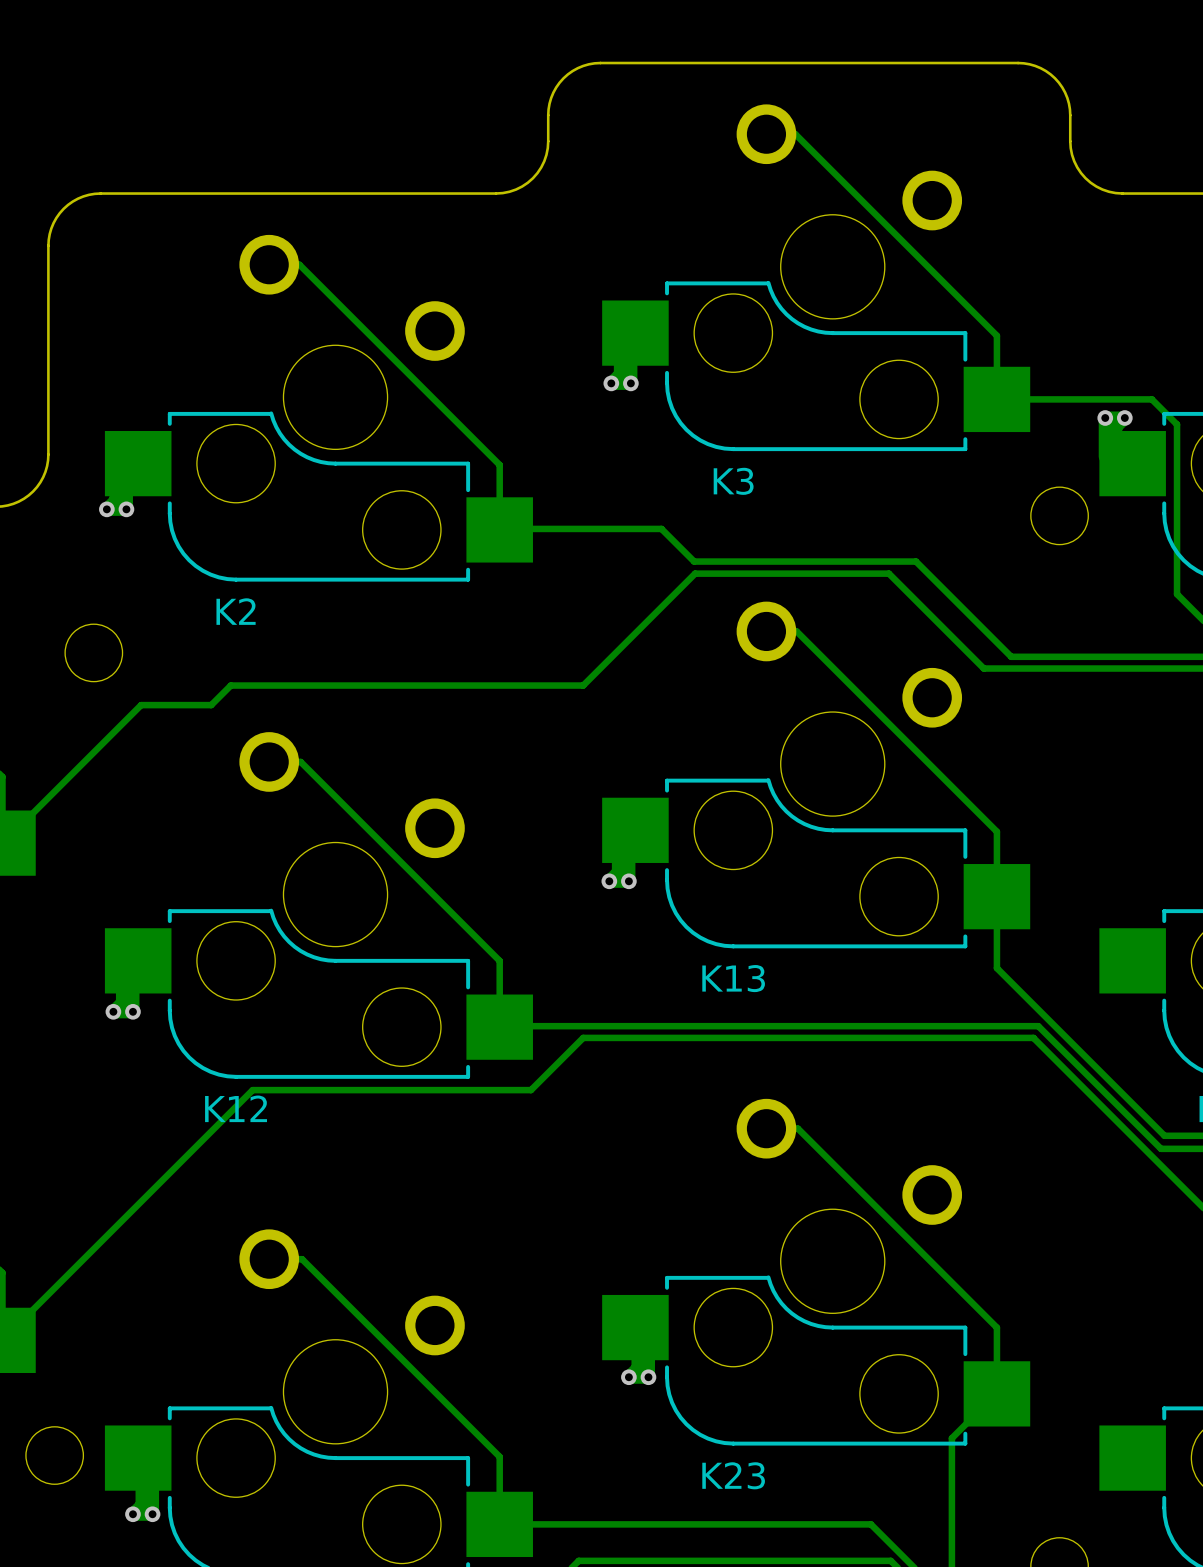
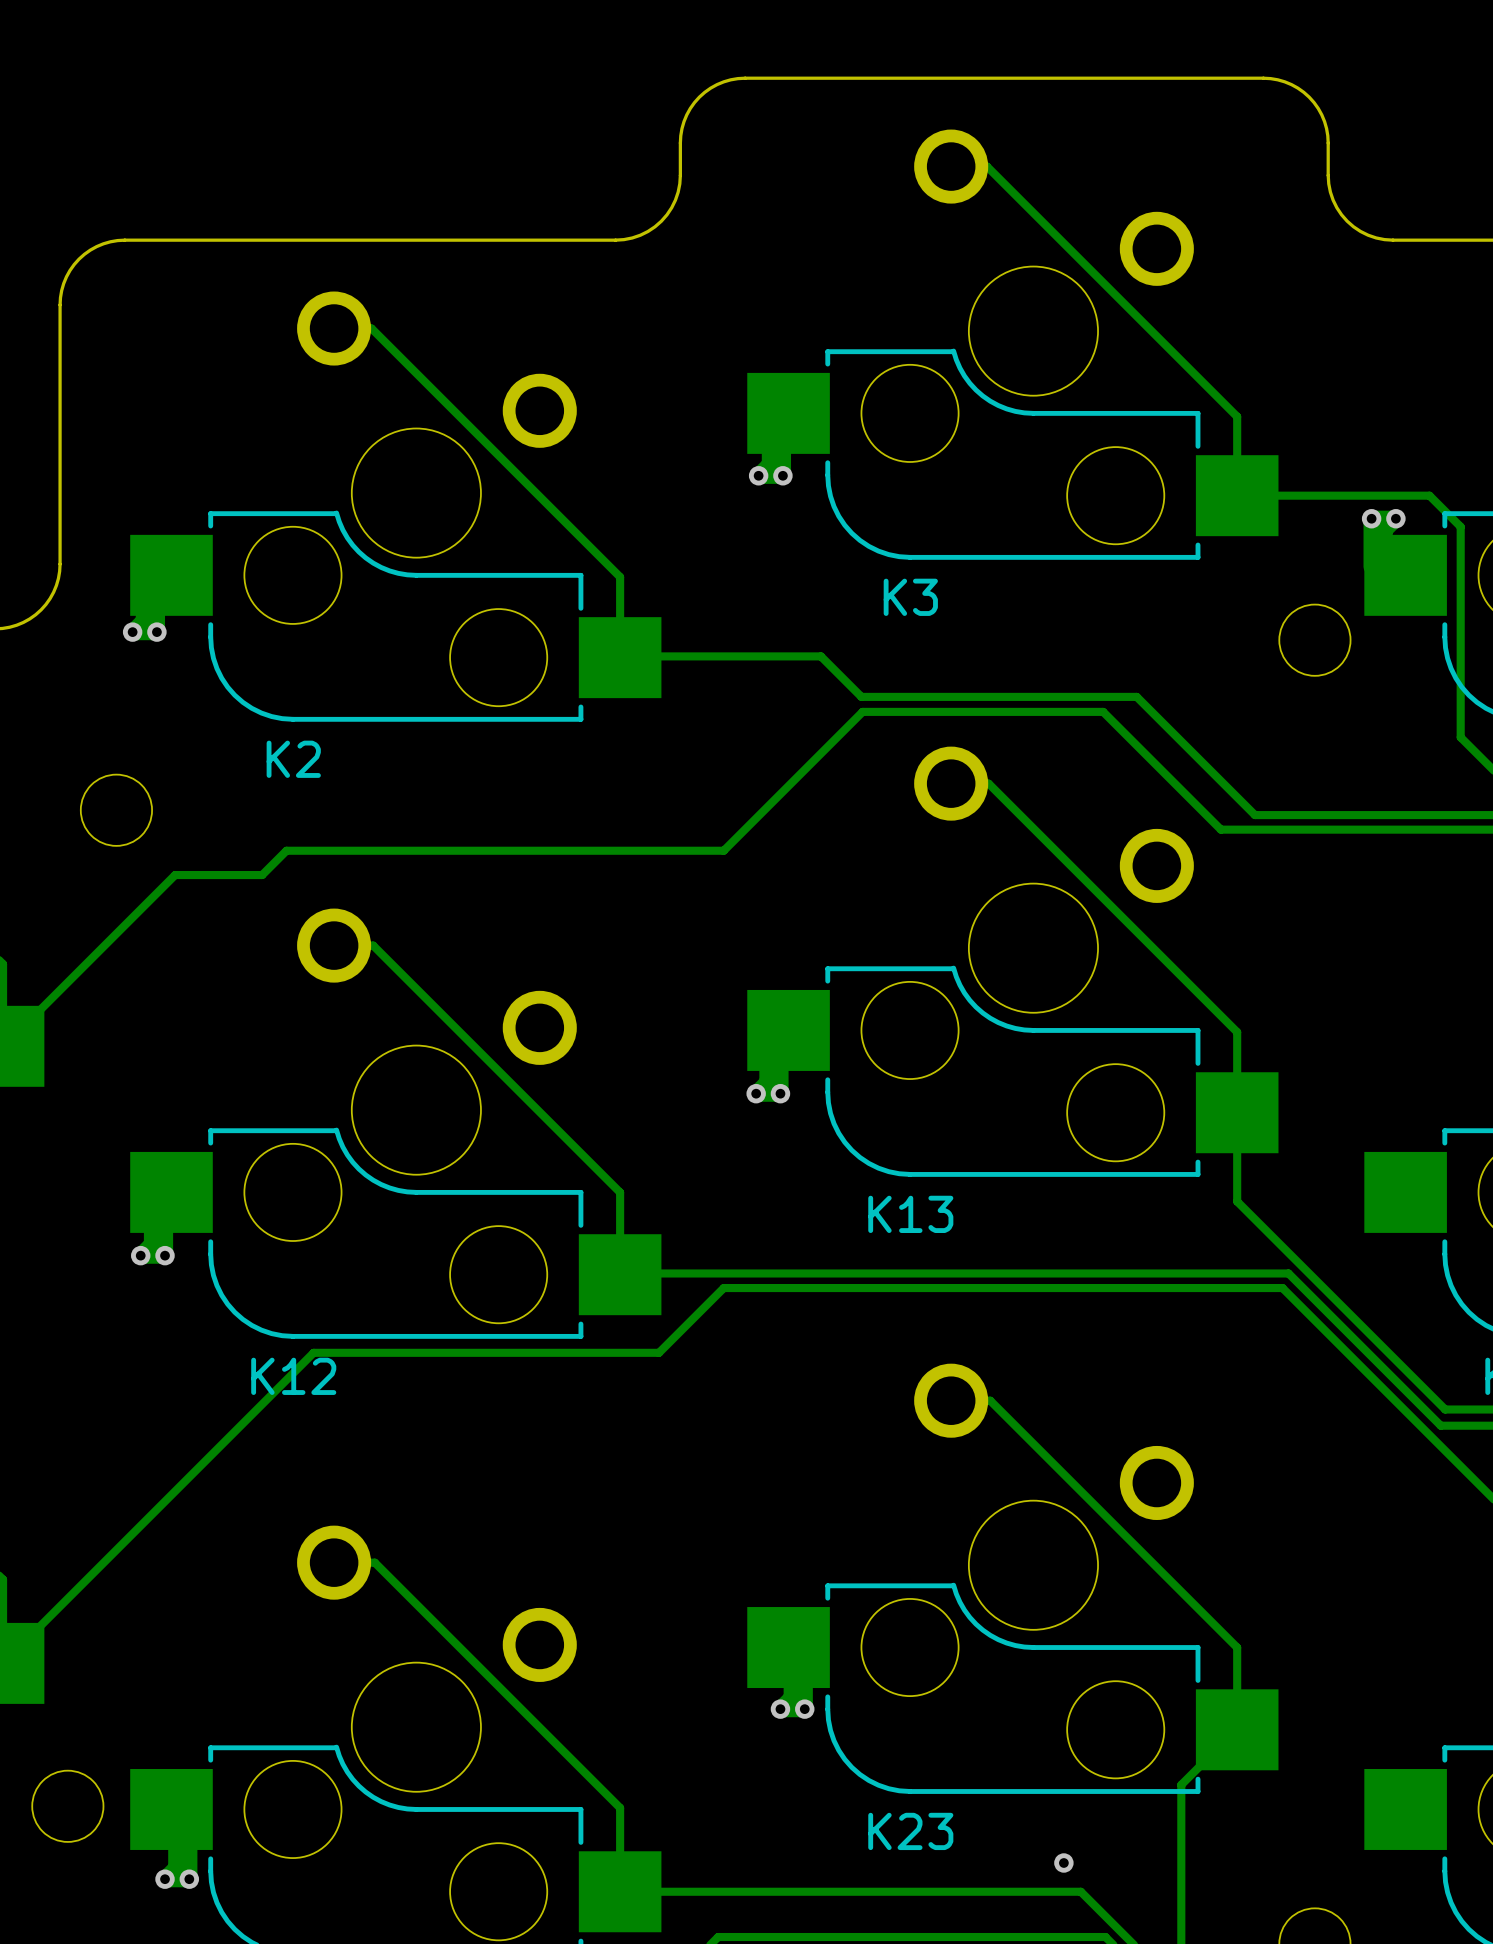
via: none -> (1063, 1862)

